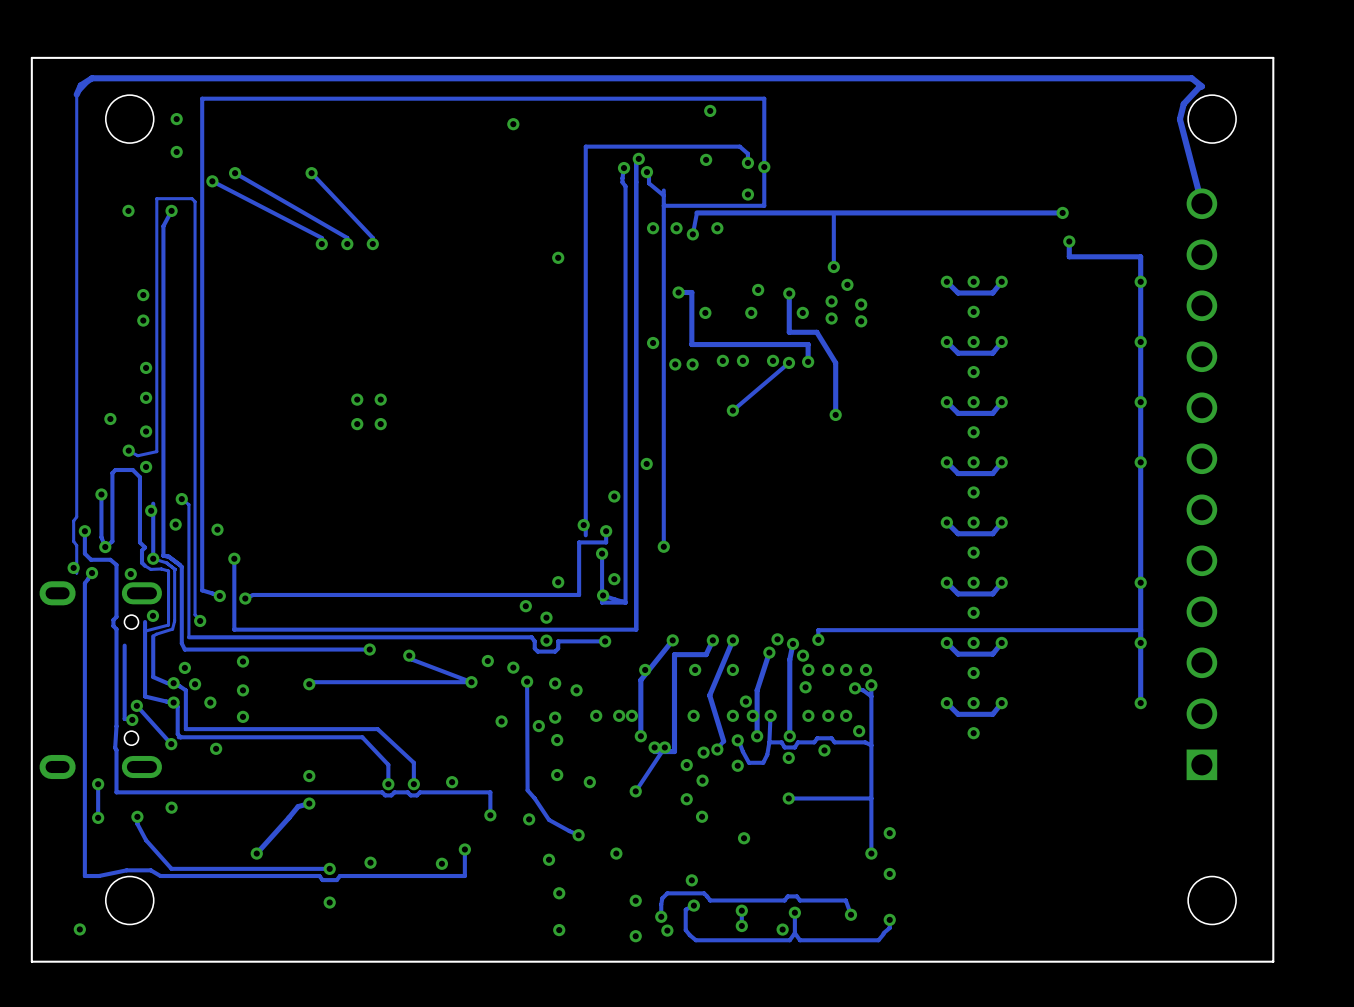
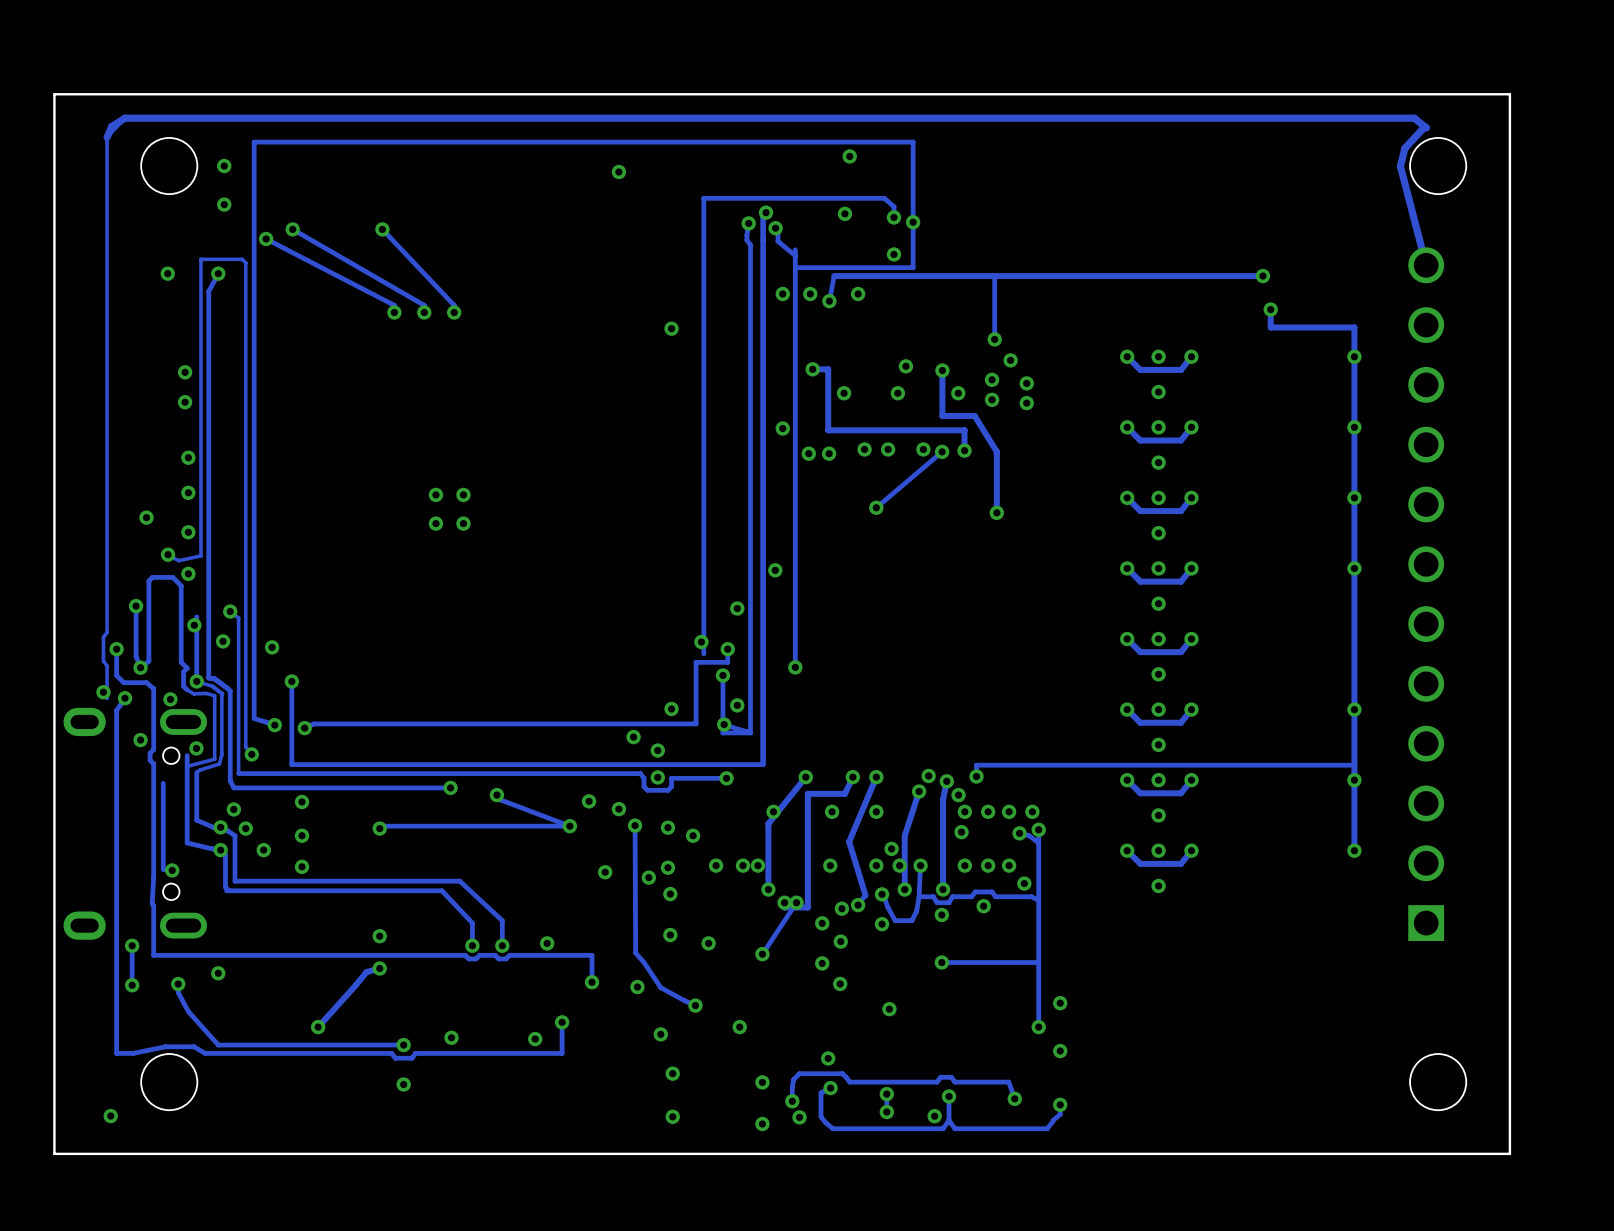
via: none -> (140, 740)
track: (136, 705) (171, 744) -> none
via: (136, 705) -> none
via: (171, 744) -> none
via: (216, 748) -> none

